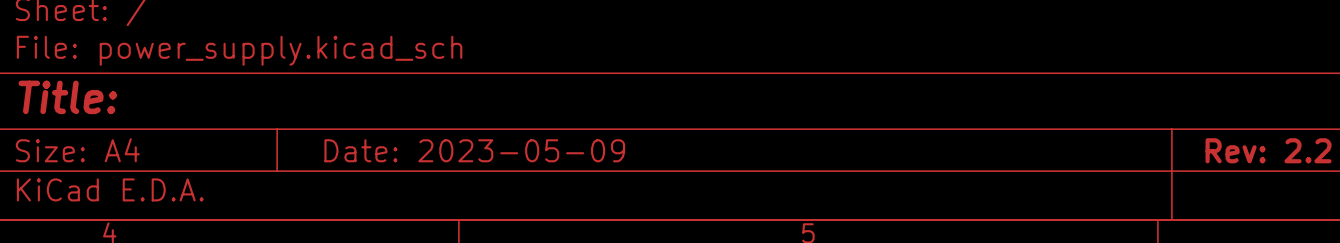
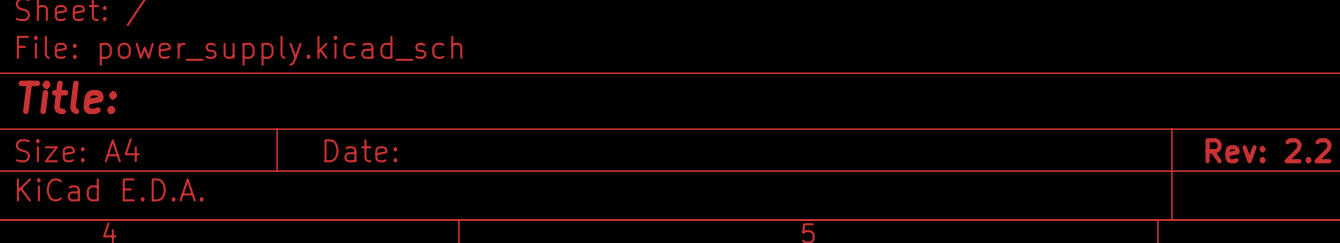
title block: Date: 2023-05-09 (474, 150) -> Date: (360, 150)

